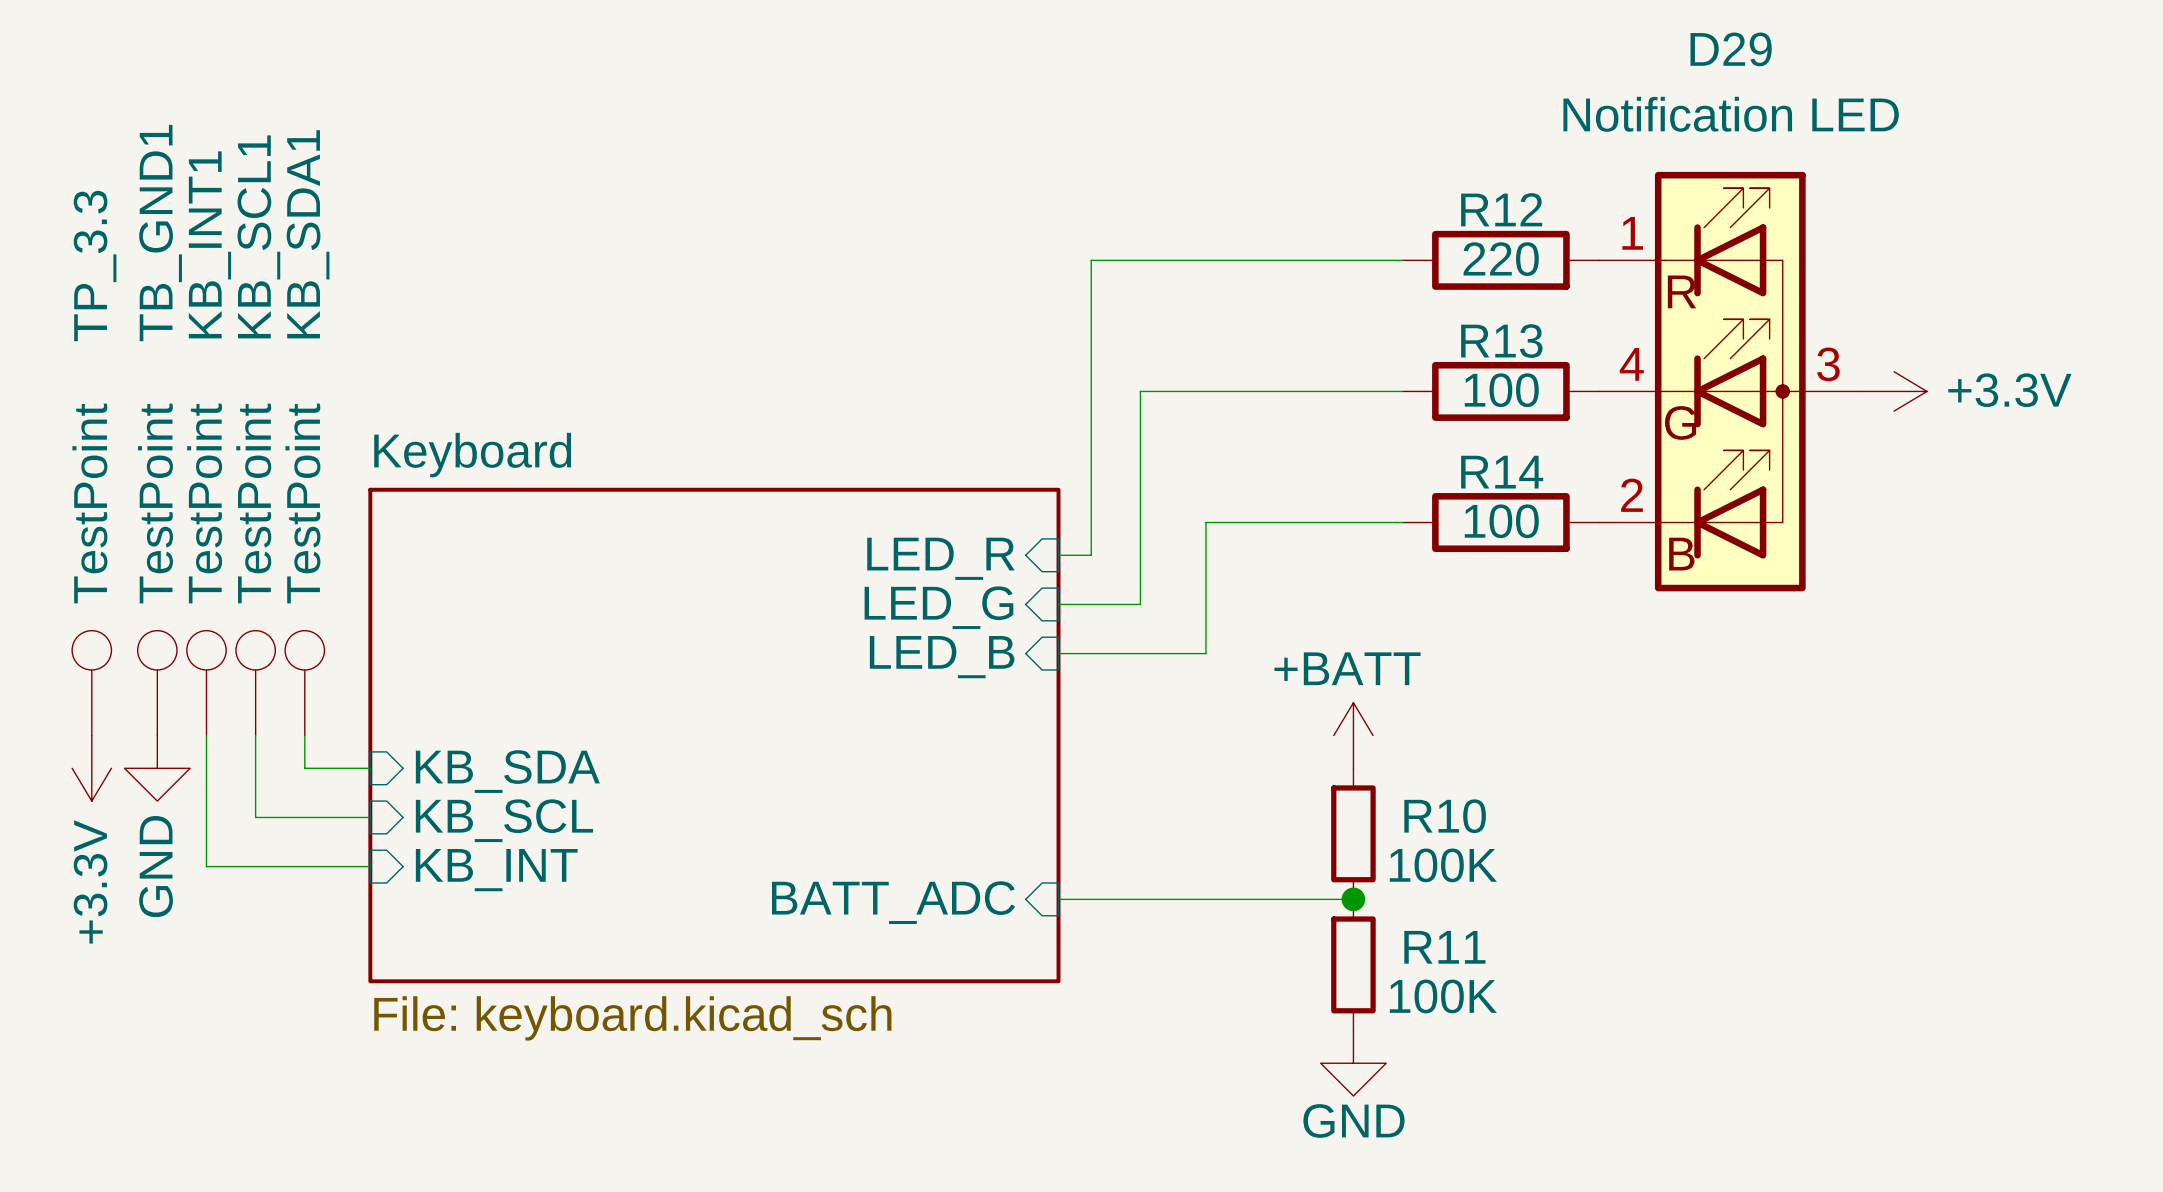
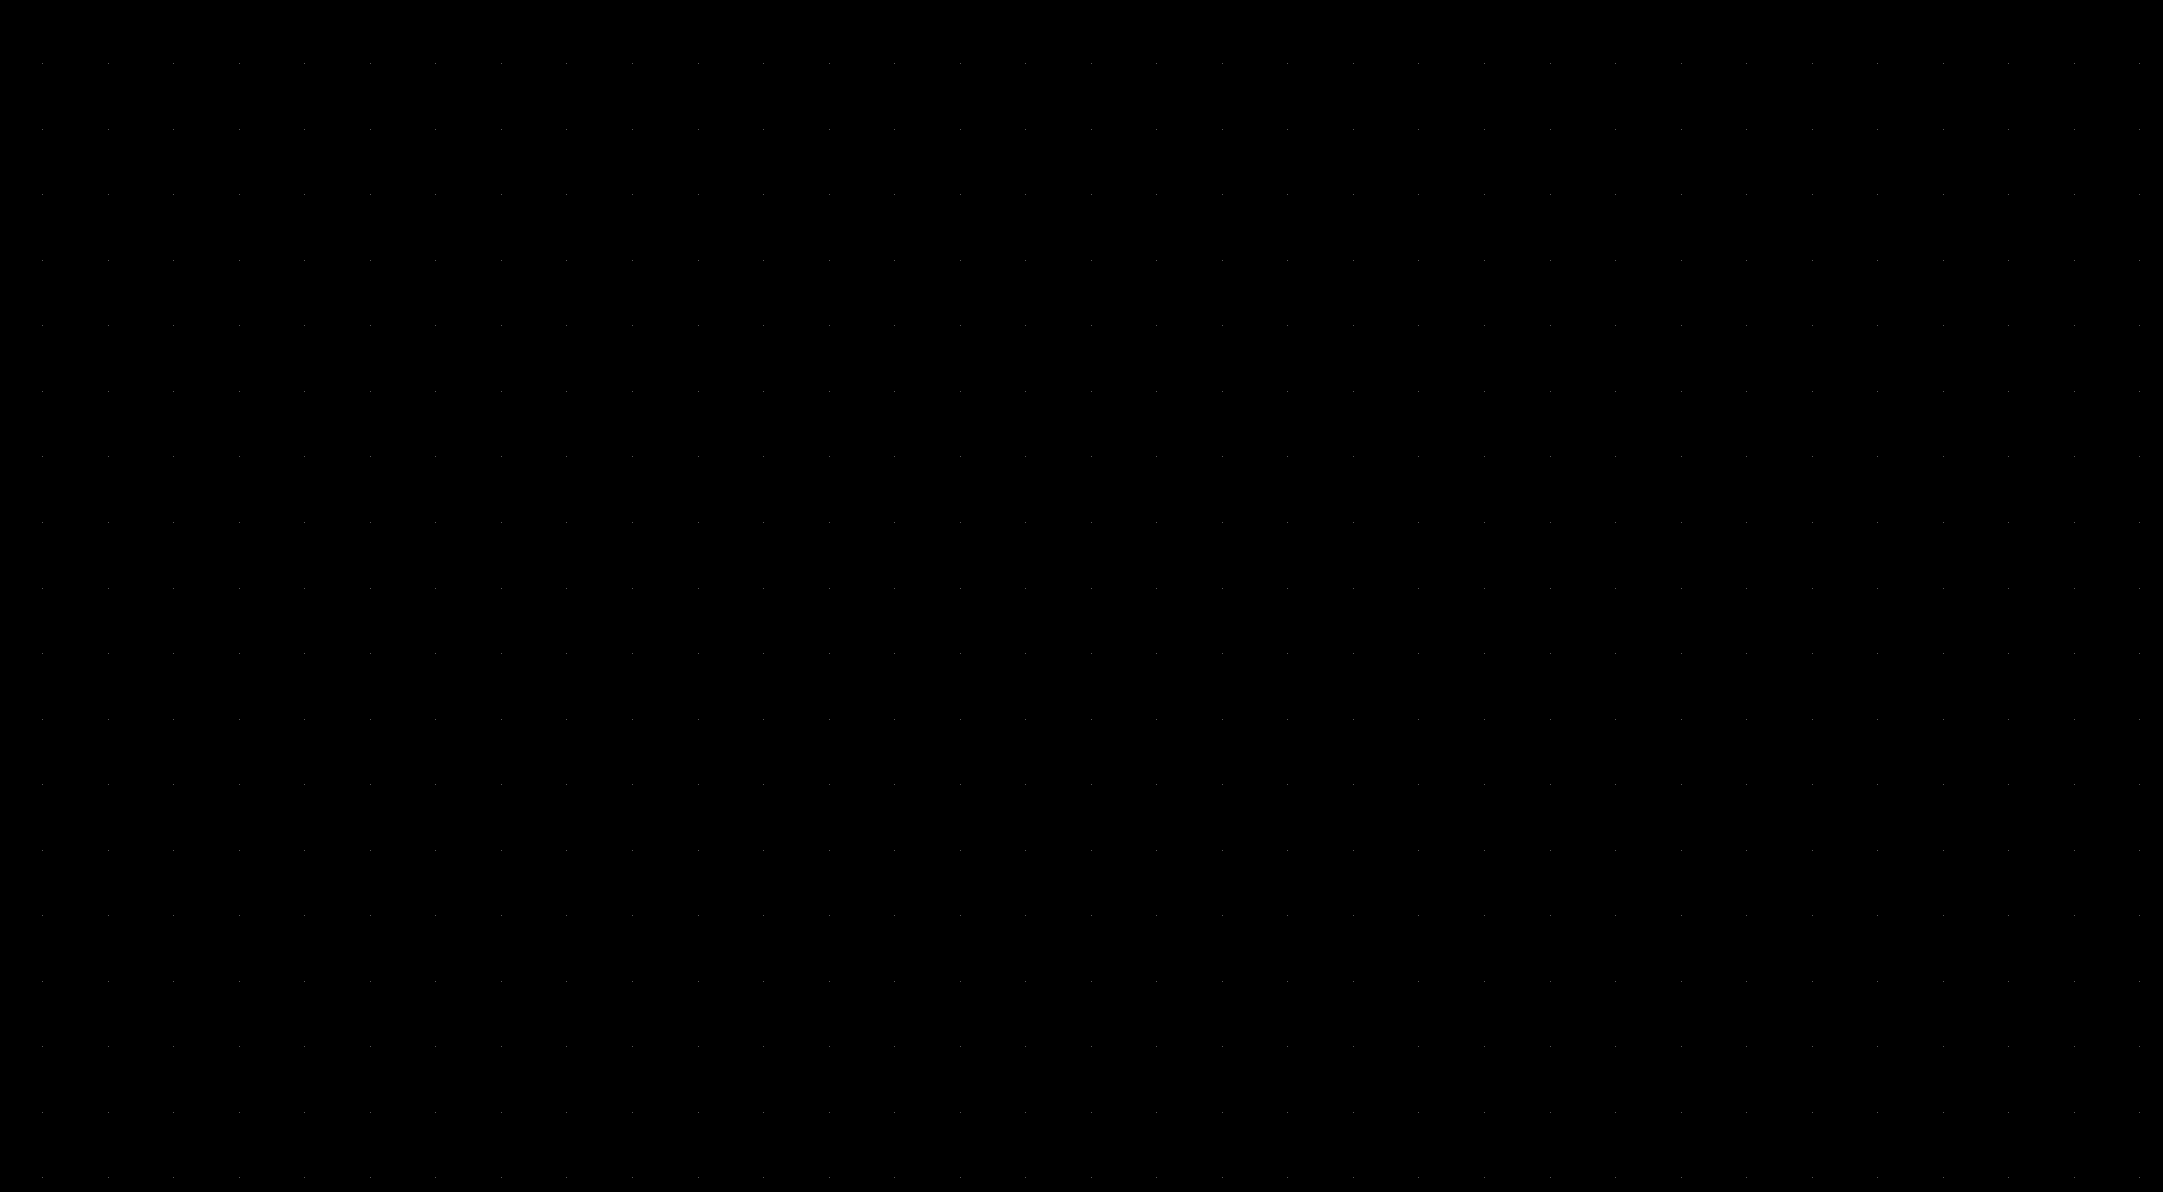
wire: (1402, 260) (1091, 260) (1091, 555) (1058, 555) -> none
R12: 220 (1500, 260) -> none
D29: Notification LED (1730, 381) -> none
wire: (1402, 391) (1140, 391) (1140, 604) (1058, 604) -> none
R13: 100 (1500, 391) -> none
power symbol: +3.3V (1894, 391) -> none
wire: (1402, 522) (1205, 522) (1205, 653) (1058, 653) -> none
R14: 100 (1500, 522) -> none
sheet pin: LED_R (940, 558) -> none
sheet pin: LED_G (938, 607) -> none
sheet pin: LED_B (942, 657) -> none
TP_3.3: TestPoint (91, 683) -> none
TB_GND1: TestPoint (157, 683) -> none
KB_INT1: TestPoint (206, 683) -> none
KB_SCL1: TestPoint (255, 683) -> none
KB_SDA1: TestPoint (304, 683) -> none
wire: (206, 735) (206, 866) (370, 866) -> none
wire: (255, 735) (255, 817) (370, 817) -> none
wire: (304, 735) (304, 768) (370, 768) -> none
sheet Keyboard: File: keyboard.kicad_sch (714, 735) -> none
power symbol: +BATT (1353, 735) -> none
power symbol: +3.3V (91, 768) -> none
power symbol: GND (157, 768) -> none
sheet pin: KB_SDA (507, 771) -> none
sheet pin: KB_SCL (504, 820) -> none
R10: 100K (1353, 833) -> none
sheet pin: KB_INT (496, 870) -> none
wire: (1058, 899) (1353, 899) -> none
junction: (1353, 899) -> none
sheet pin: BATT_ADC (893, 902) -> none
R11: 100K (1353, 964) -> none
power symbol: GND (1353, 1063) -> none

